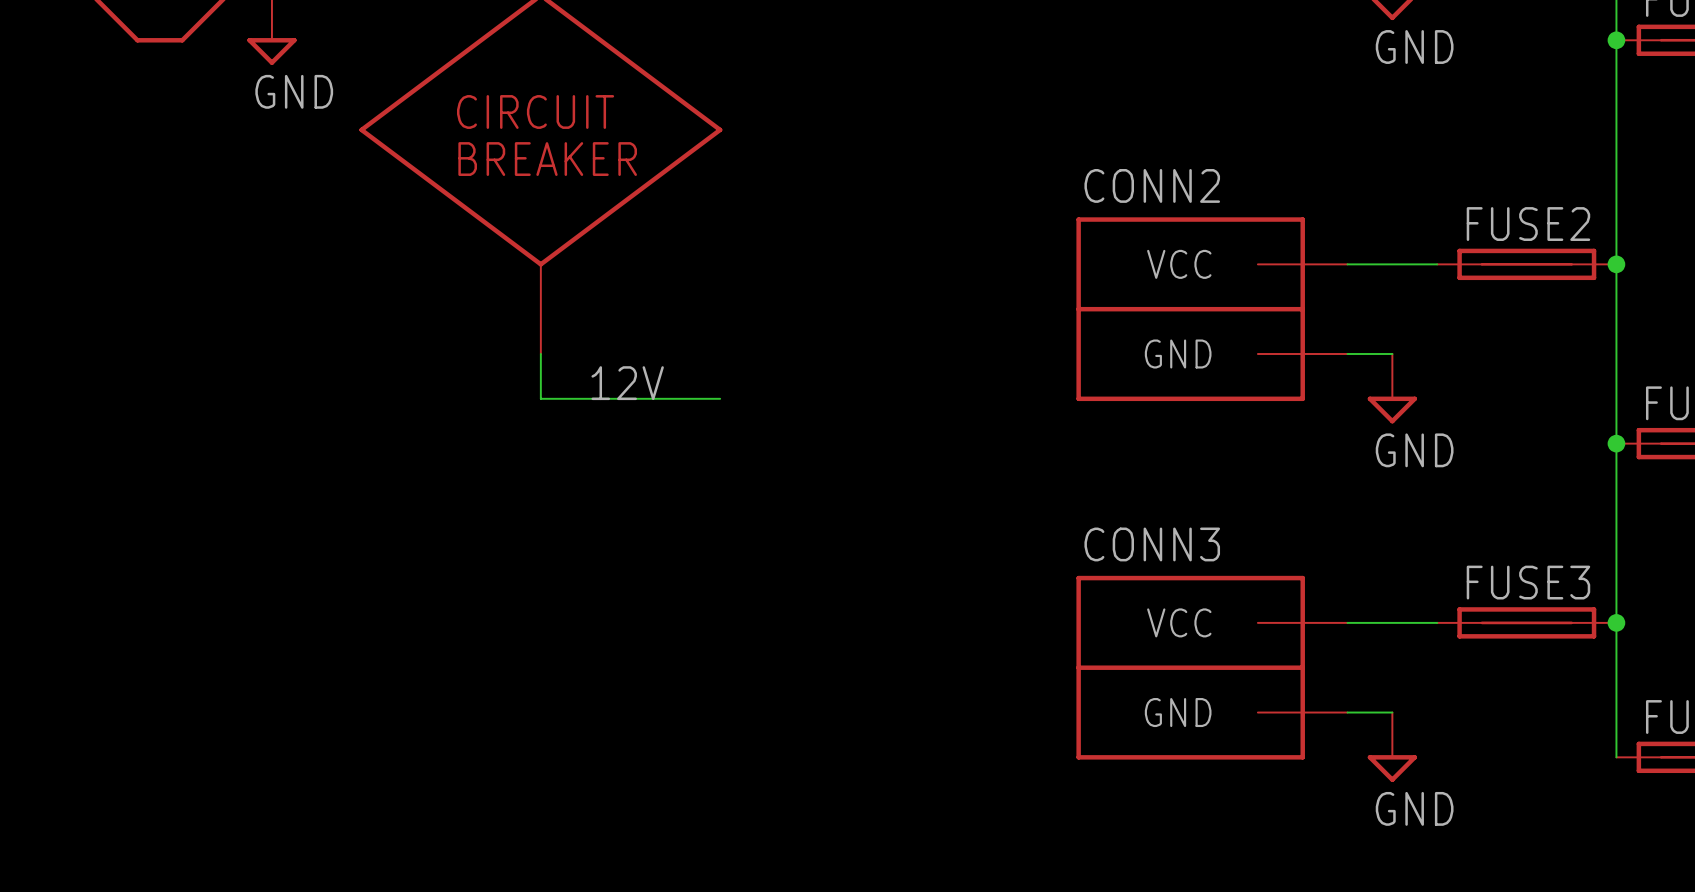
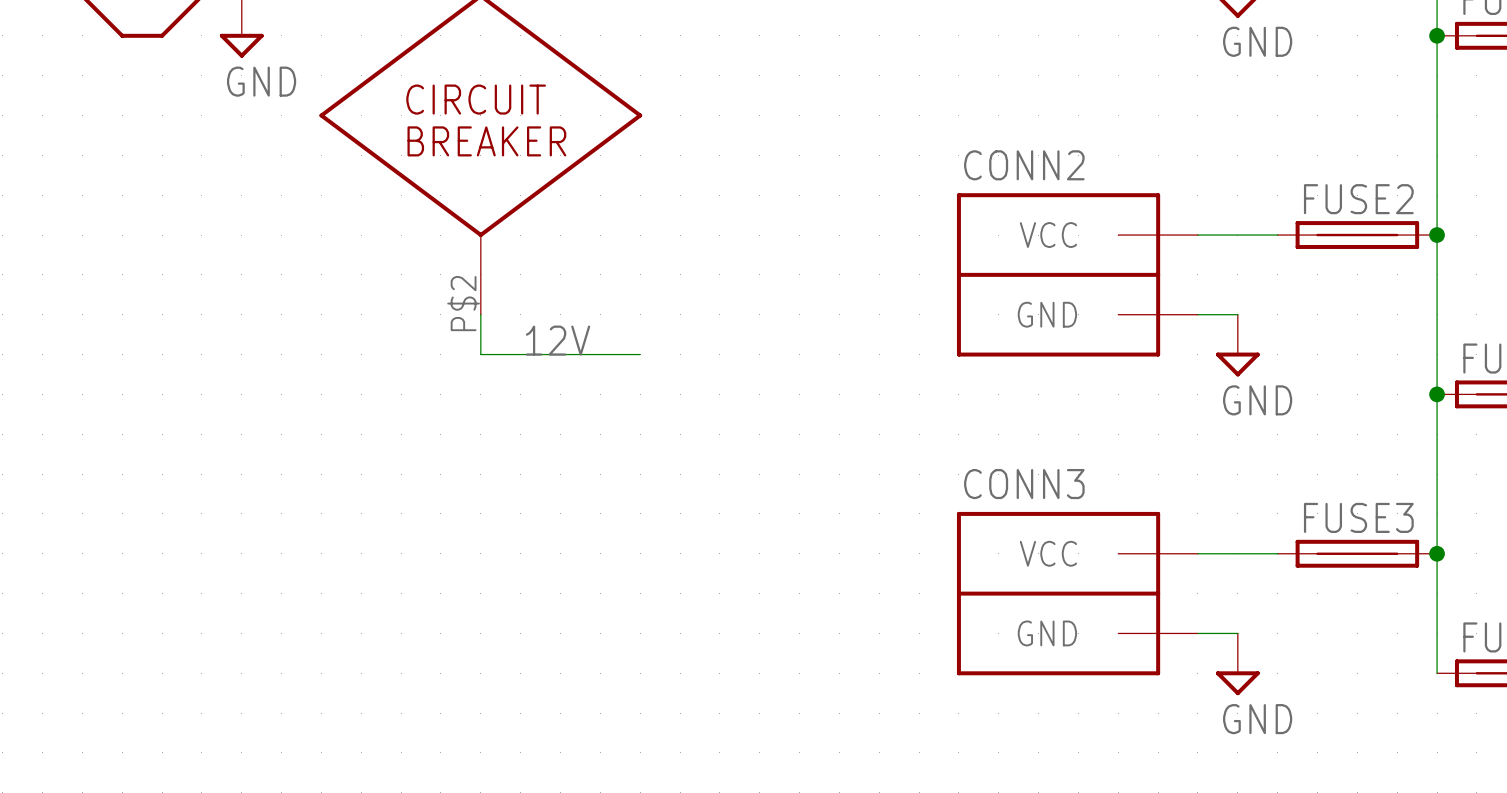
part pin number: none -> P$2 (463, 303)

